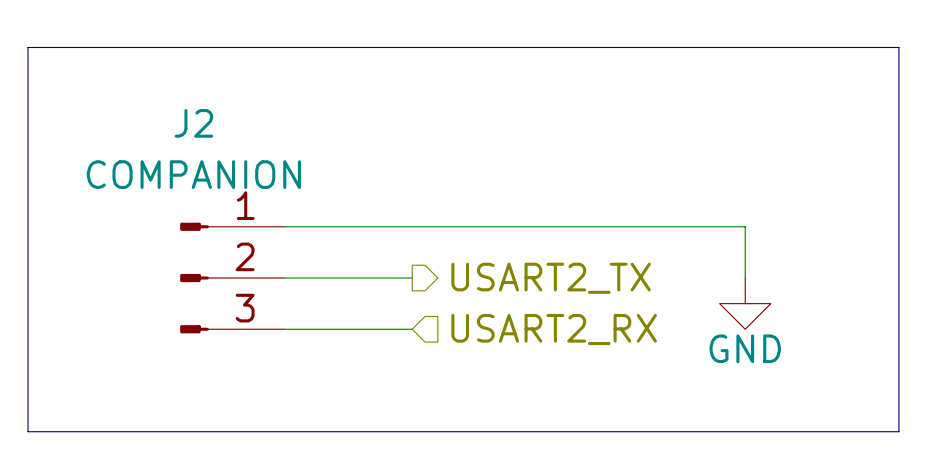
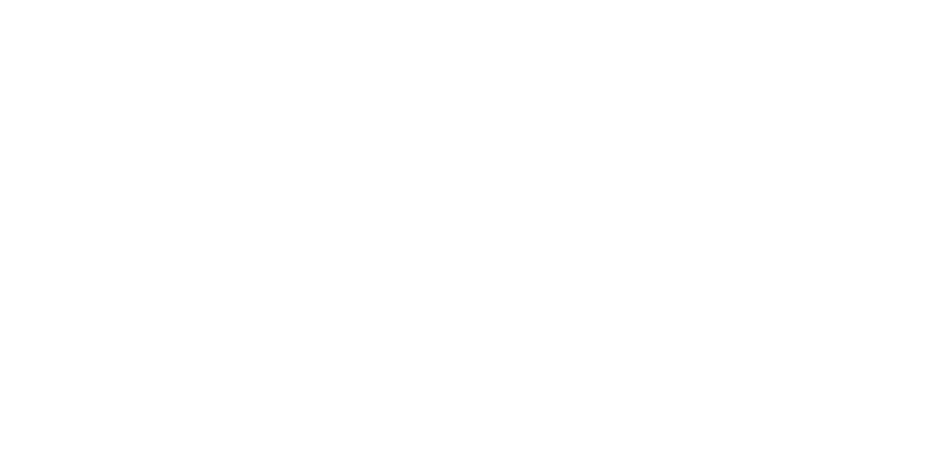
line: (27, 47) (898, 47) (898, 431) (27, 431) (27, 47) -> none
wire: (284, 226) (745, 226) (745, 278) -> none
J2: COMPANION (232, 278) -> none
wire: (284, 278) (412, 278) -> none
hierarchical label: USART2_TX (551, 278) -> none
power symbol: GND (745, 303) -> none
wire: (284, 329) (412, 329) -> none
hierarchical label: USART2_RX (554, 329) -> none

